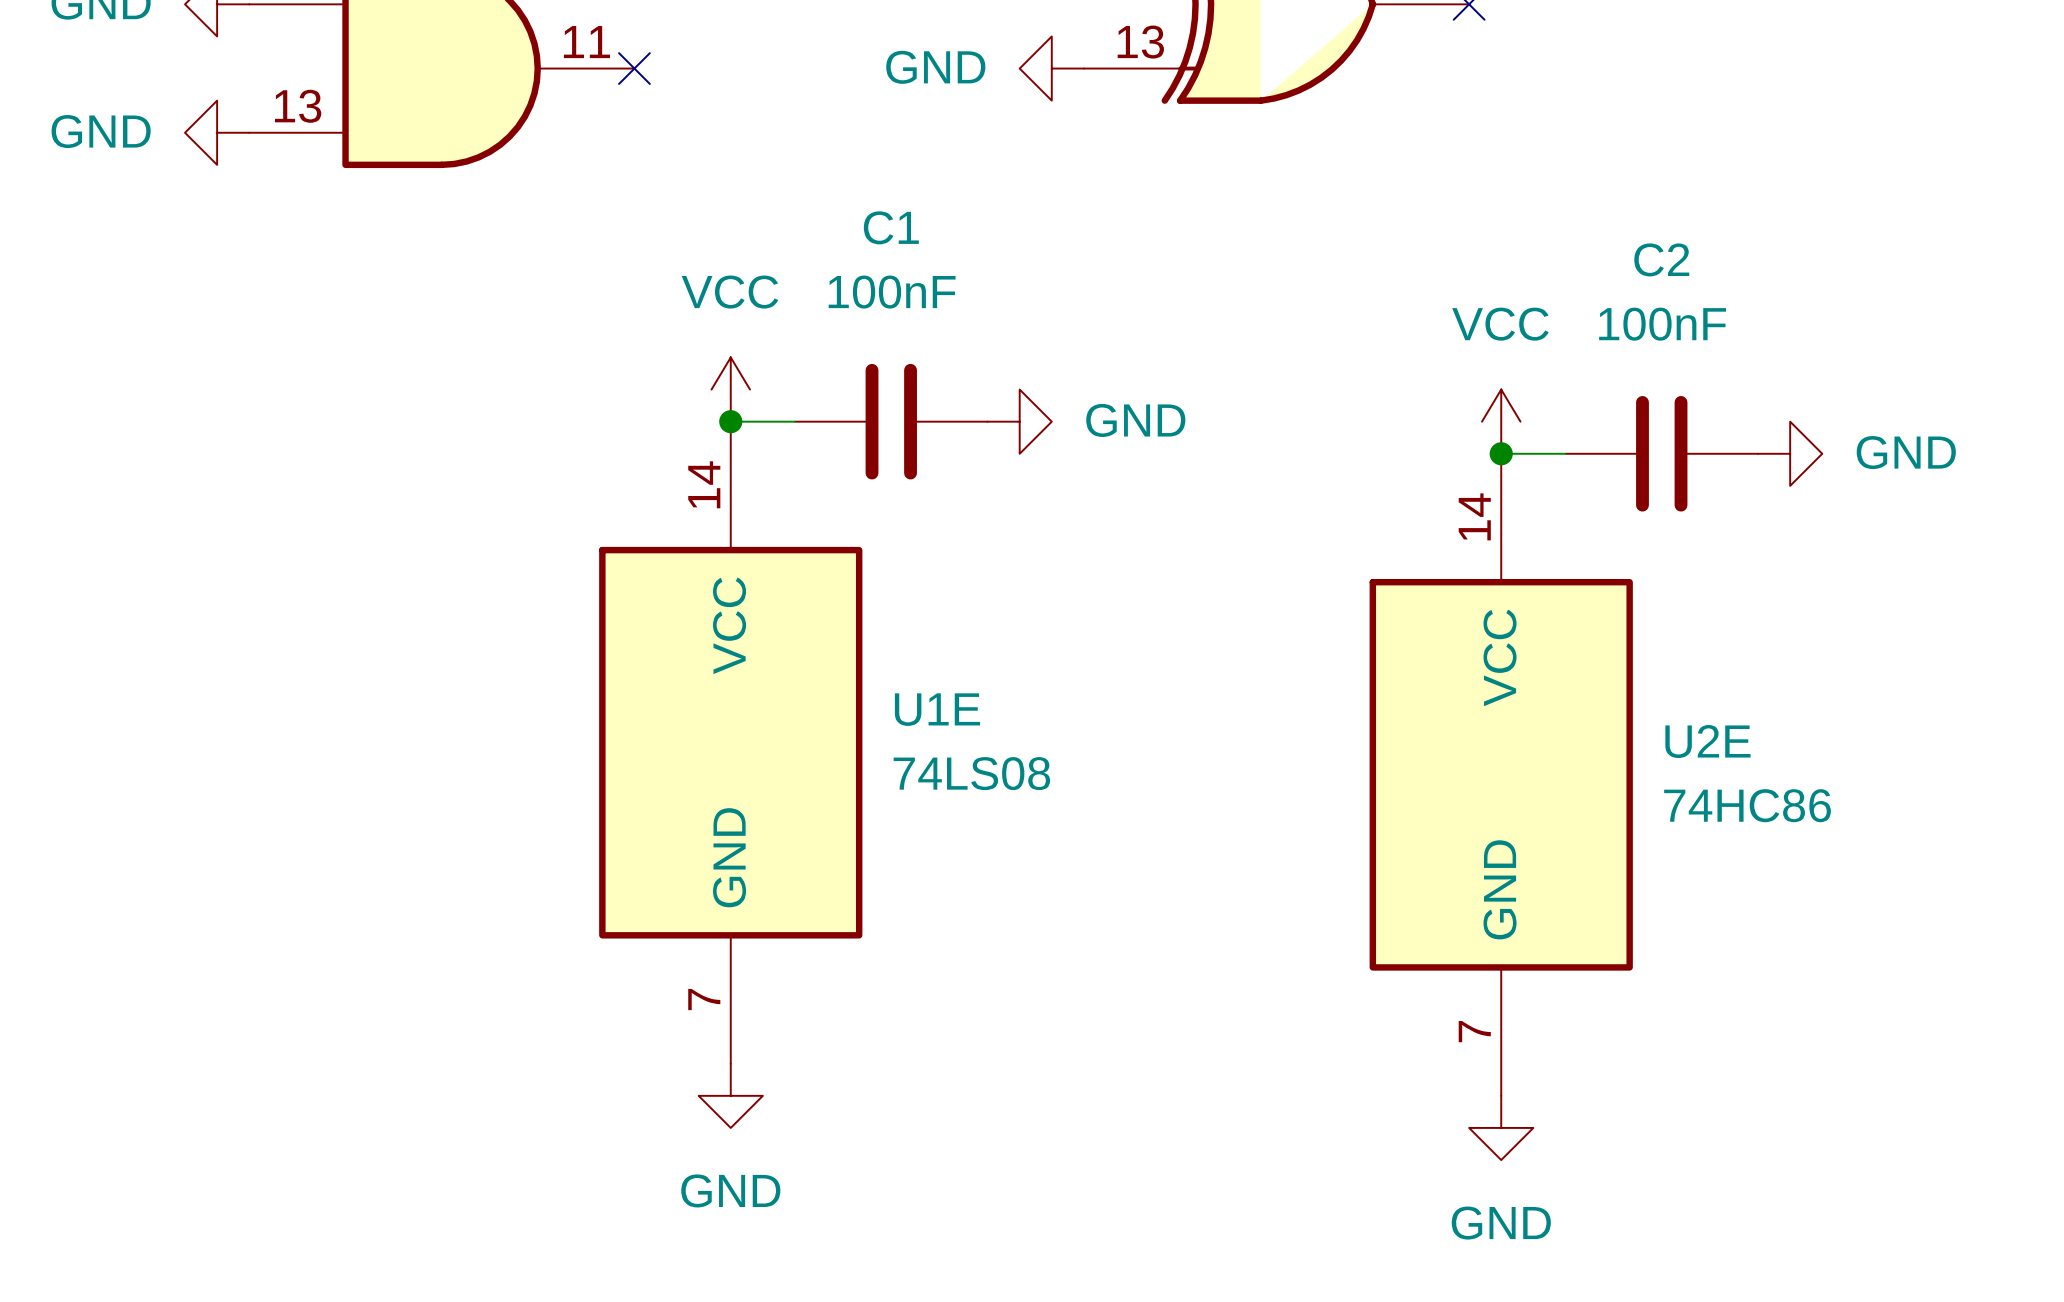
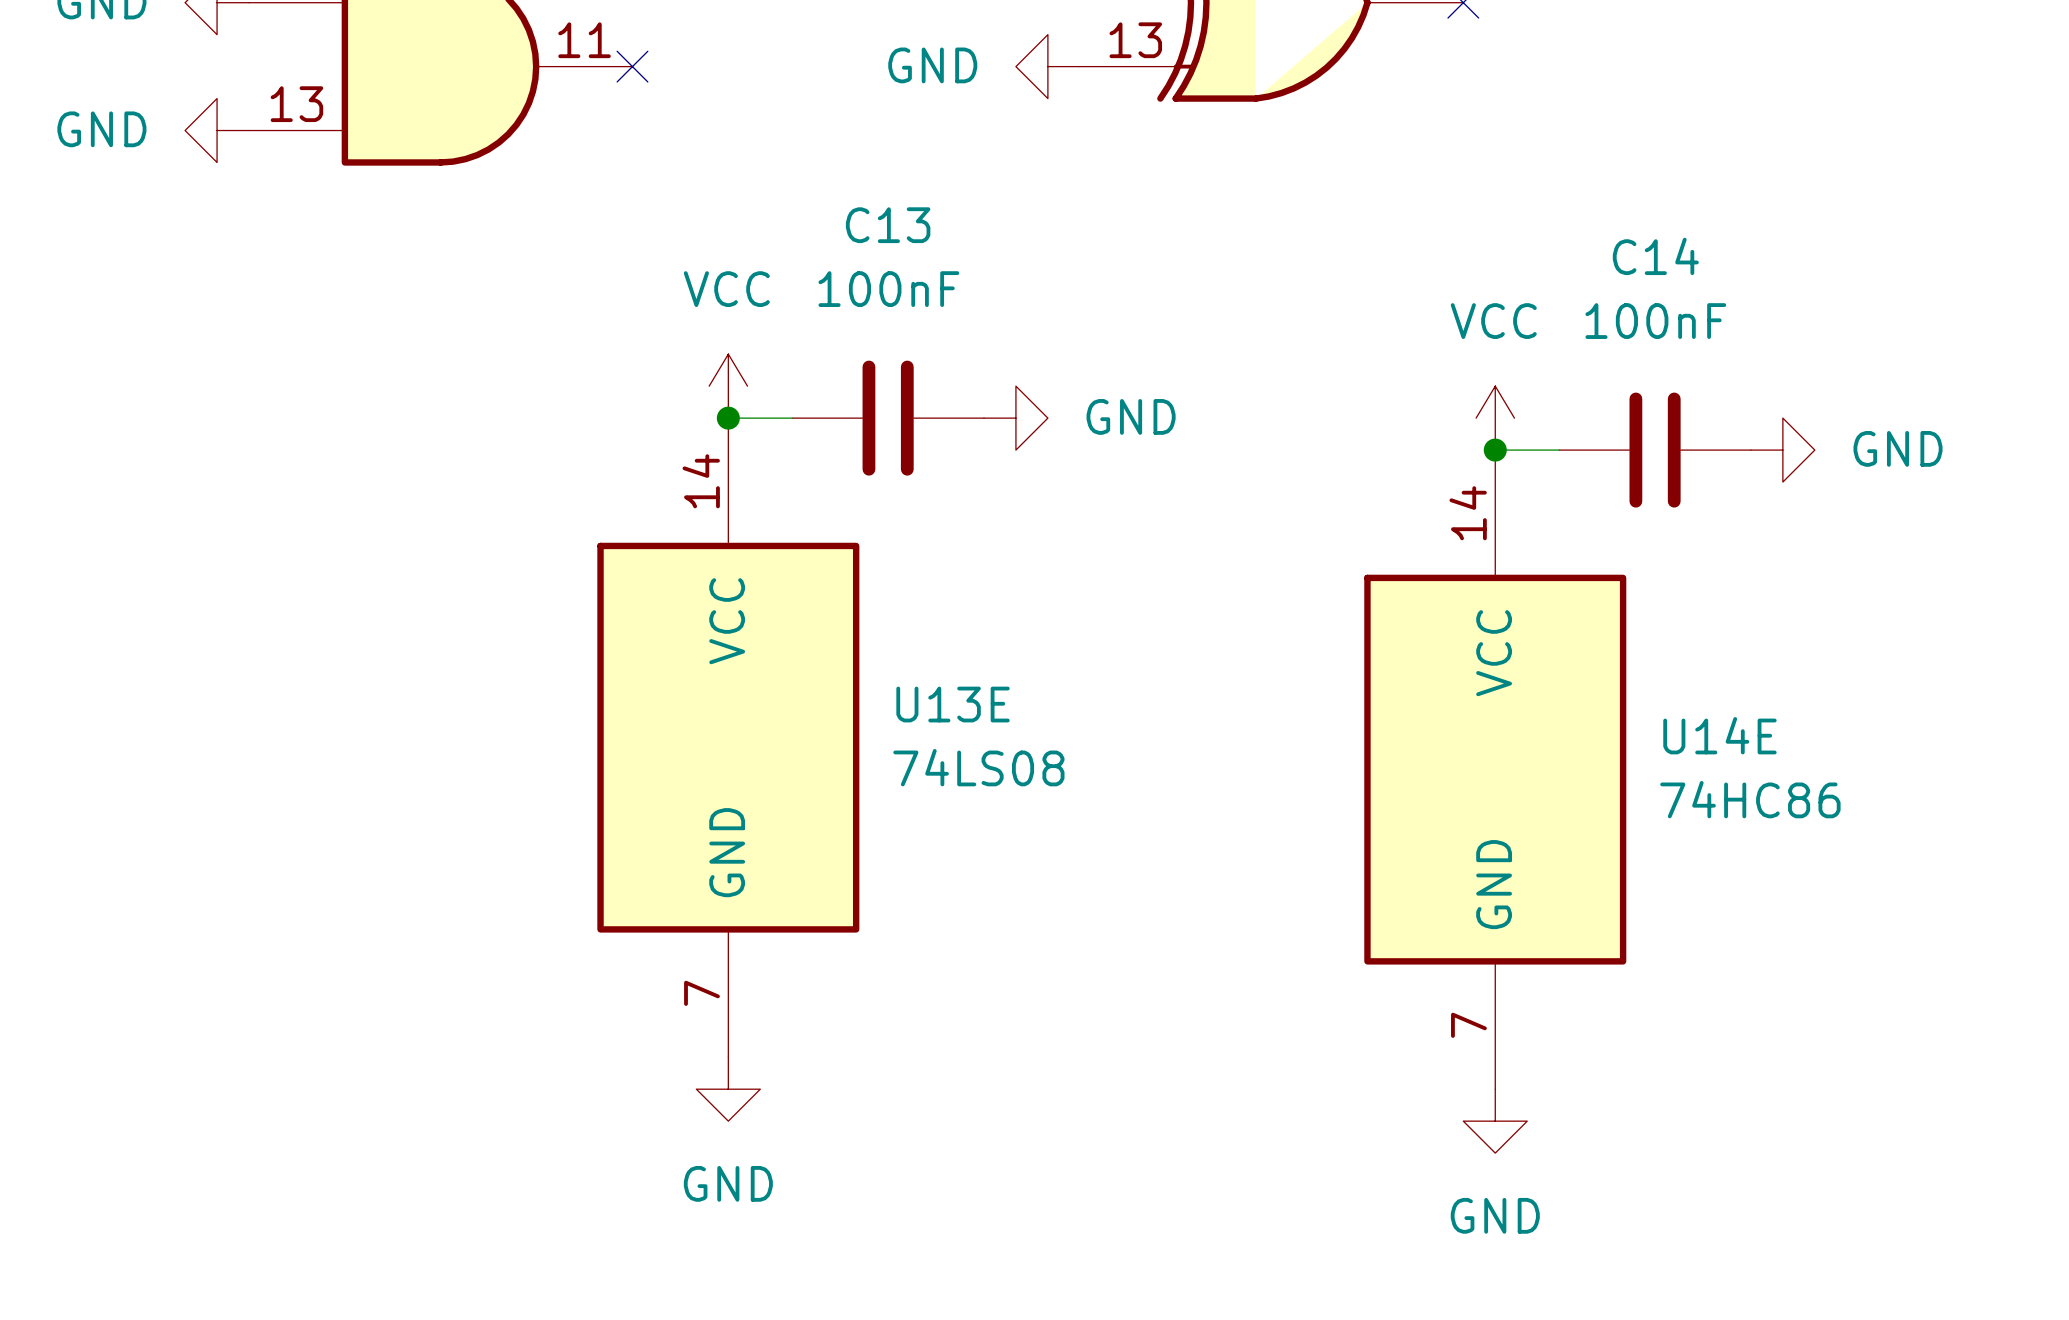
C1 name: C1 (891, 227) -> C13 (888, 225)
C2 name: C2 (1661, 259) -> C14 (1655, 256)
U1E name: U1E (937, 709) -> U13E (953, 704)
U2E name: U2E (1707, 741) -> U14E (1719, 735)

